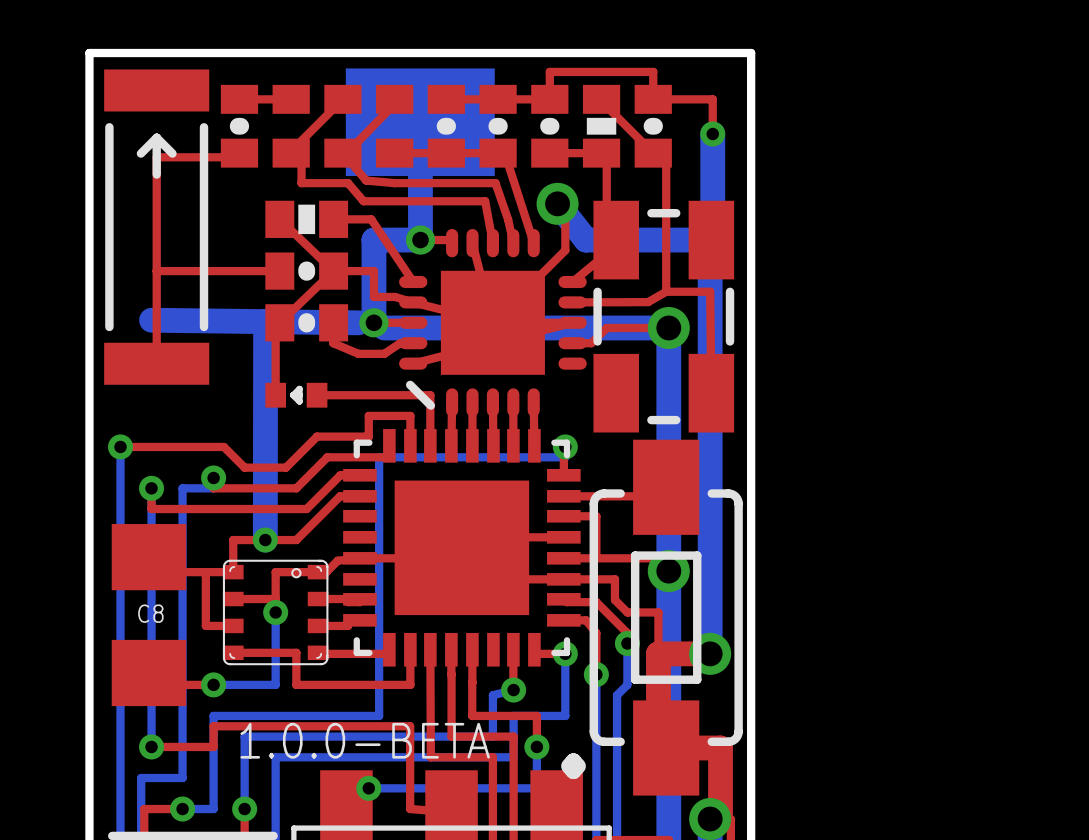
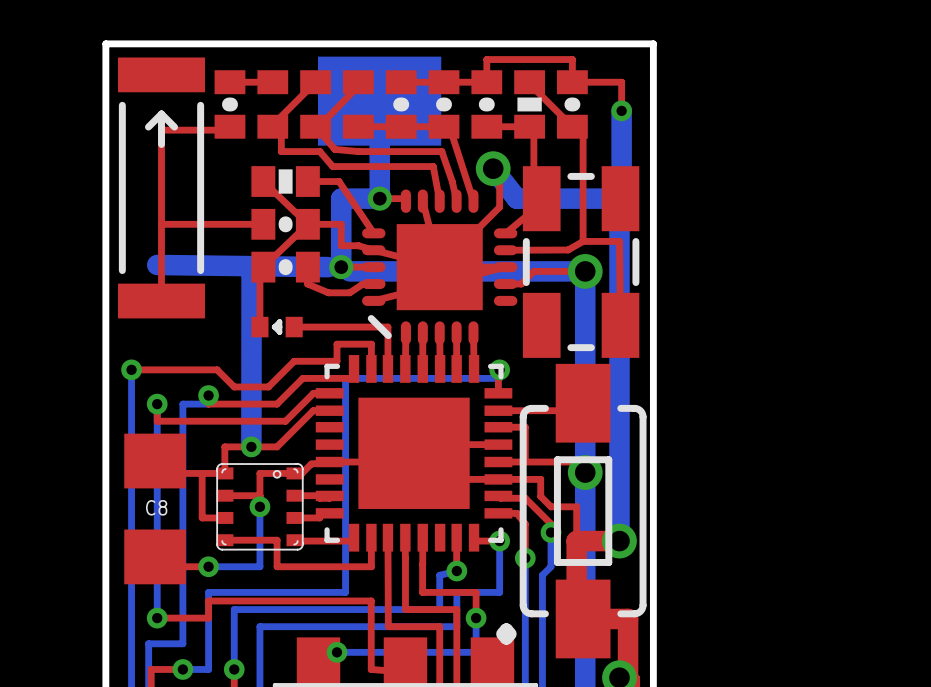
text: 1.0.0-BETA (365, 740) -> none

